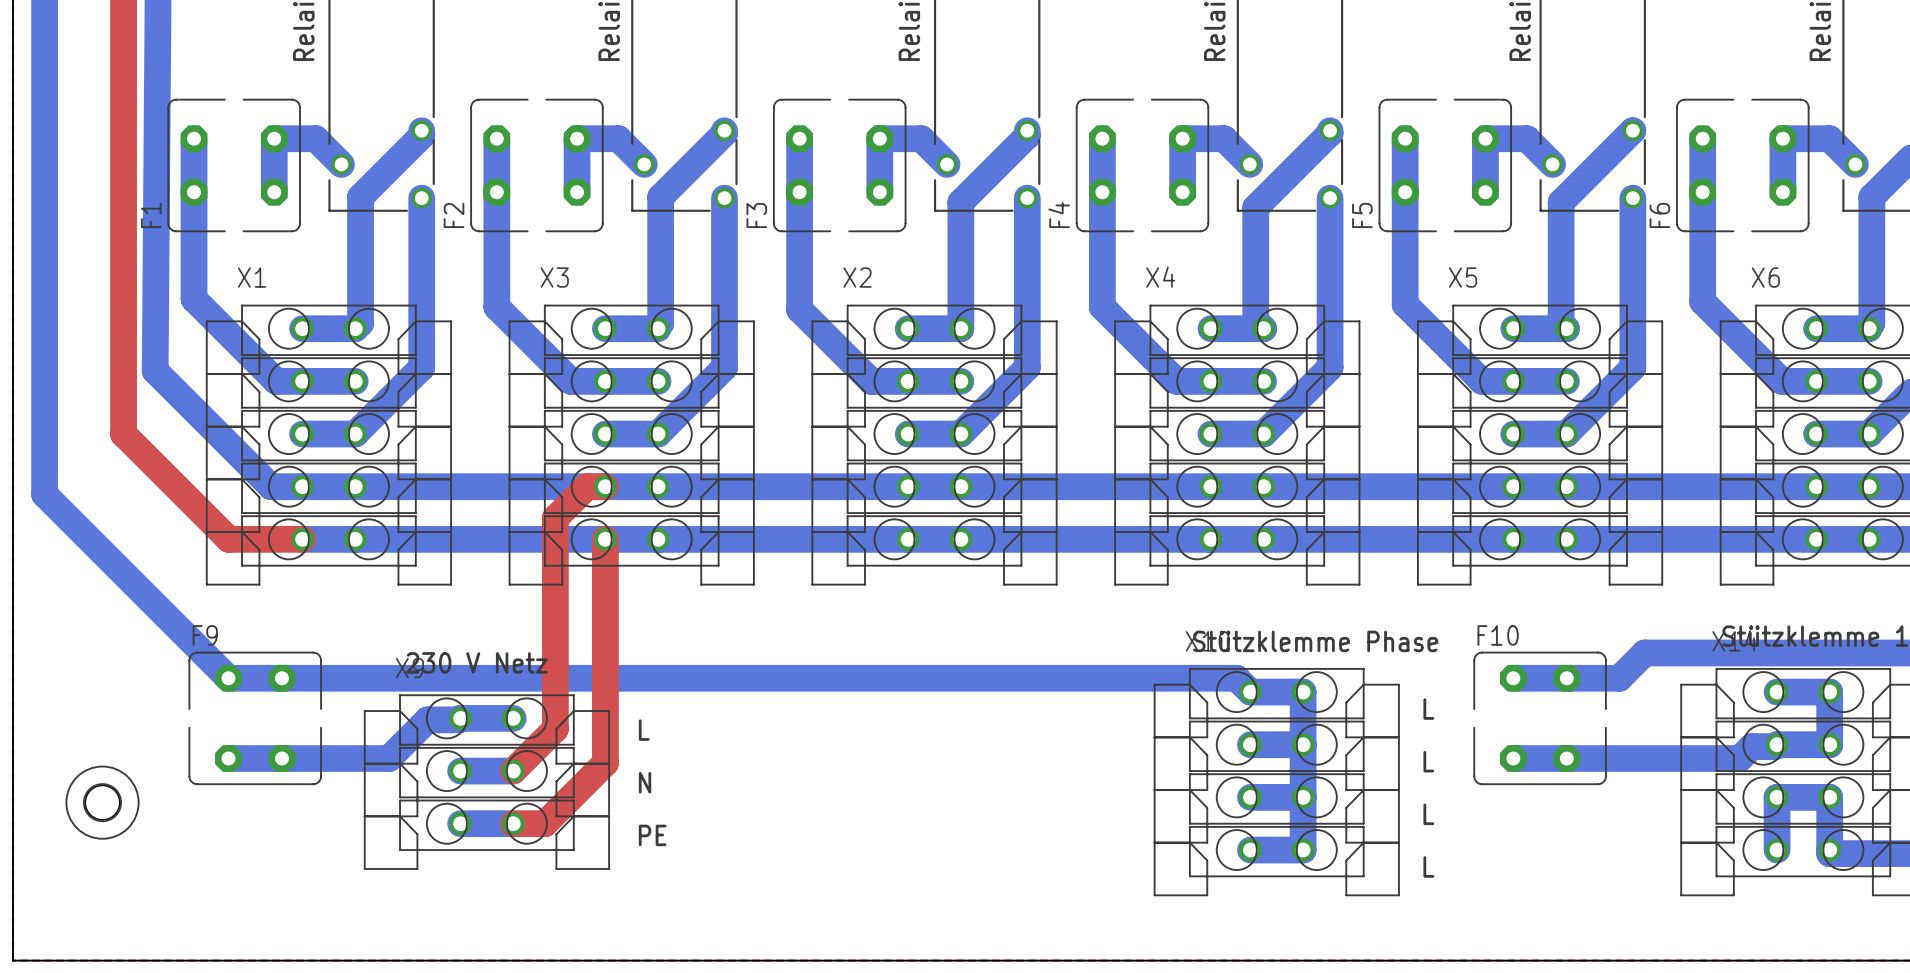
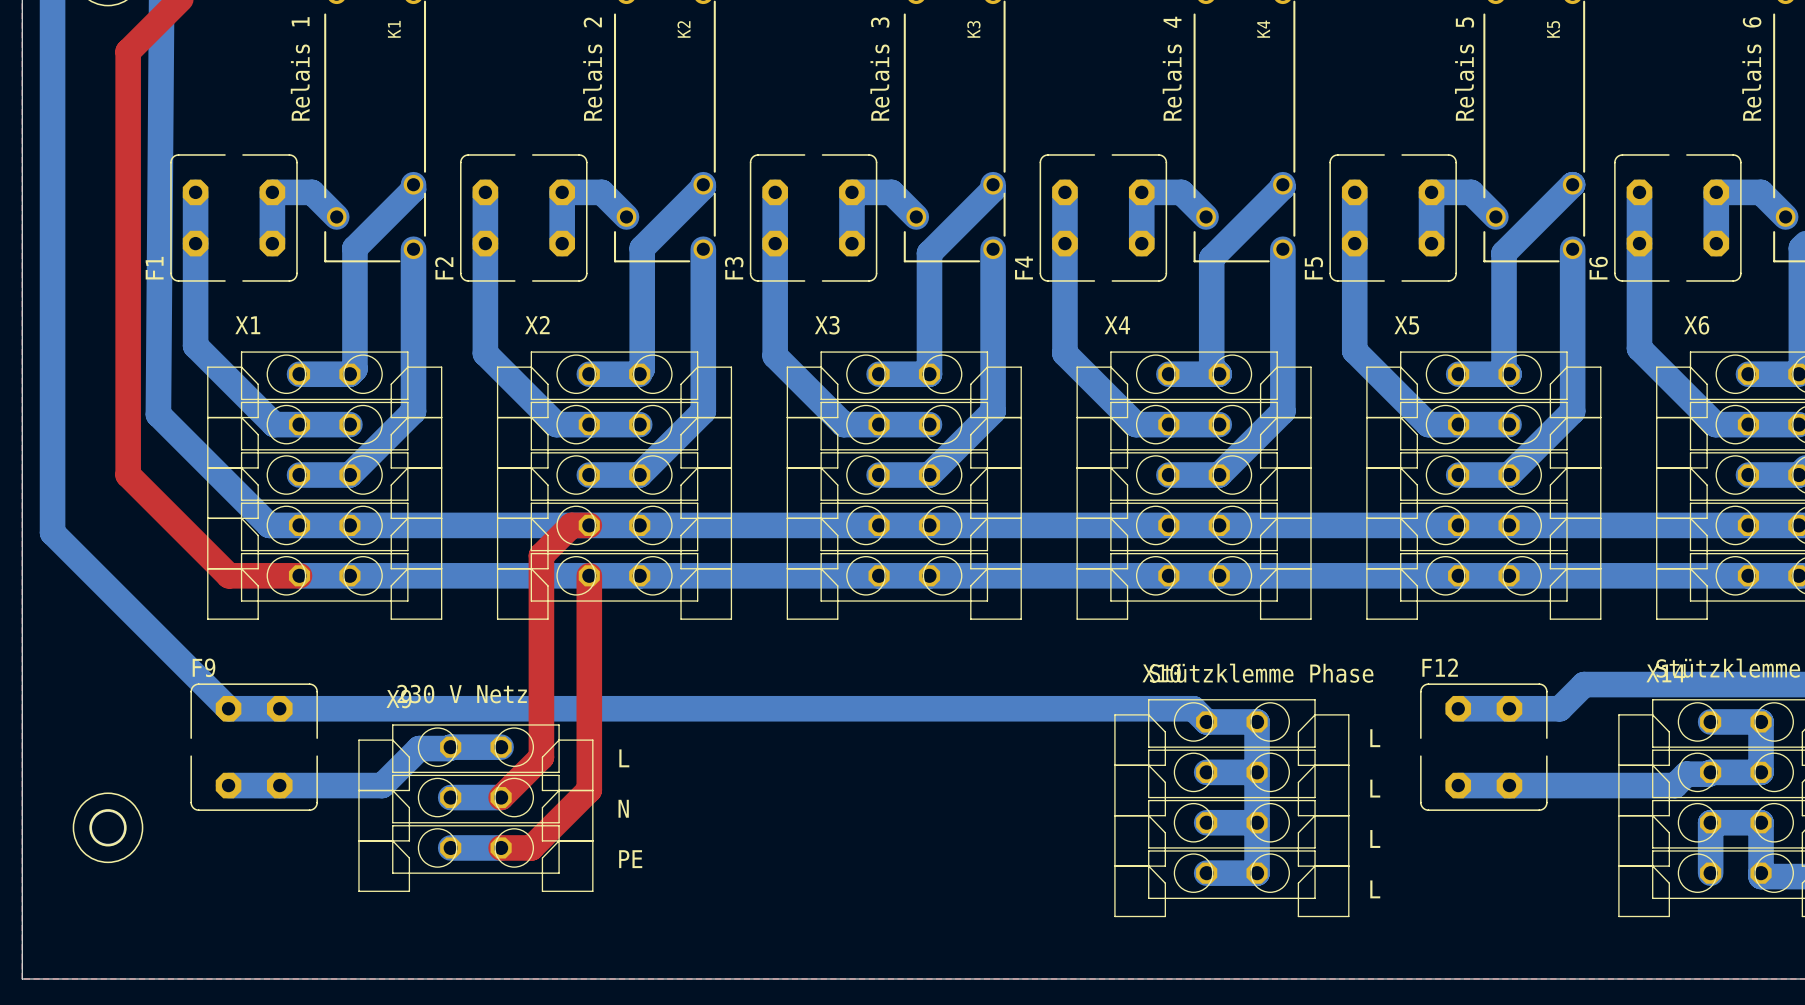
X3 name: X3 (554, 277) -> X2 (537, 325)
X2 name: X2 (857, 277) -> X3 (827, 325)
F10 name: F10 (1498, 635) -> F12 (1440, 667)

